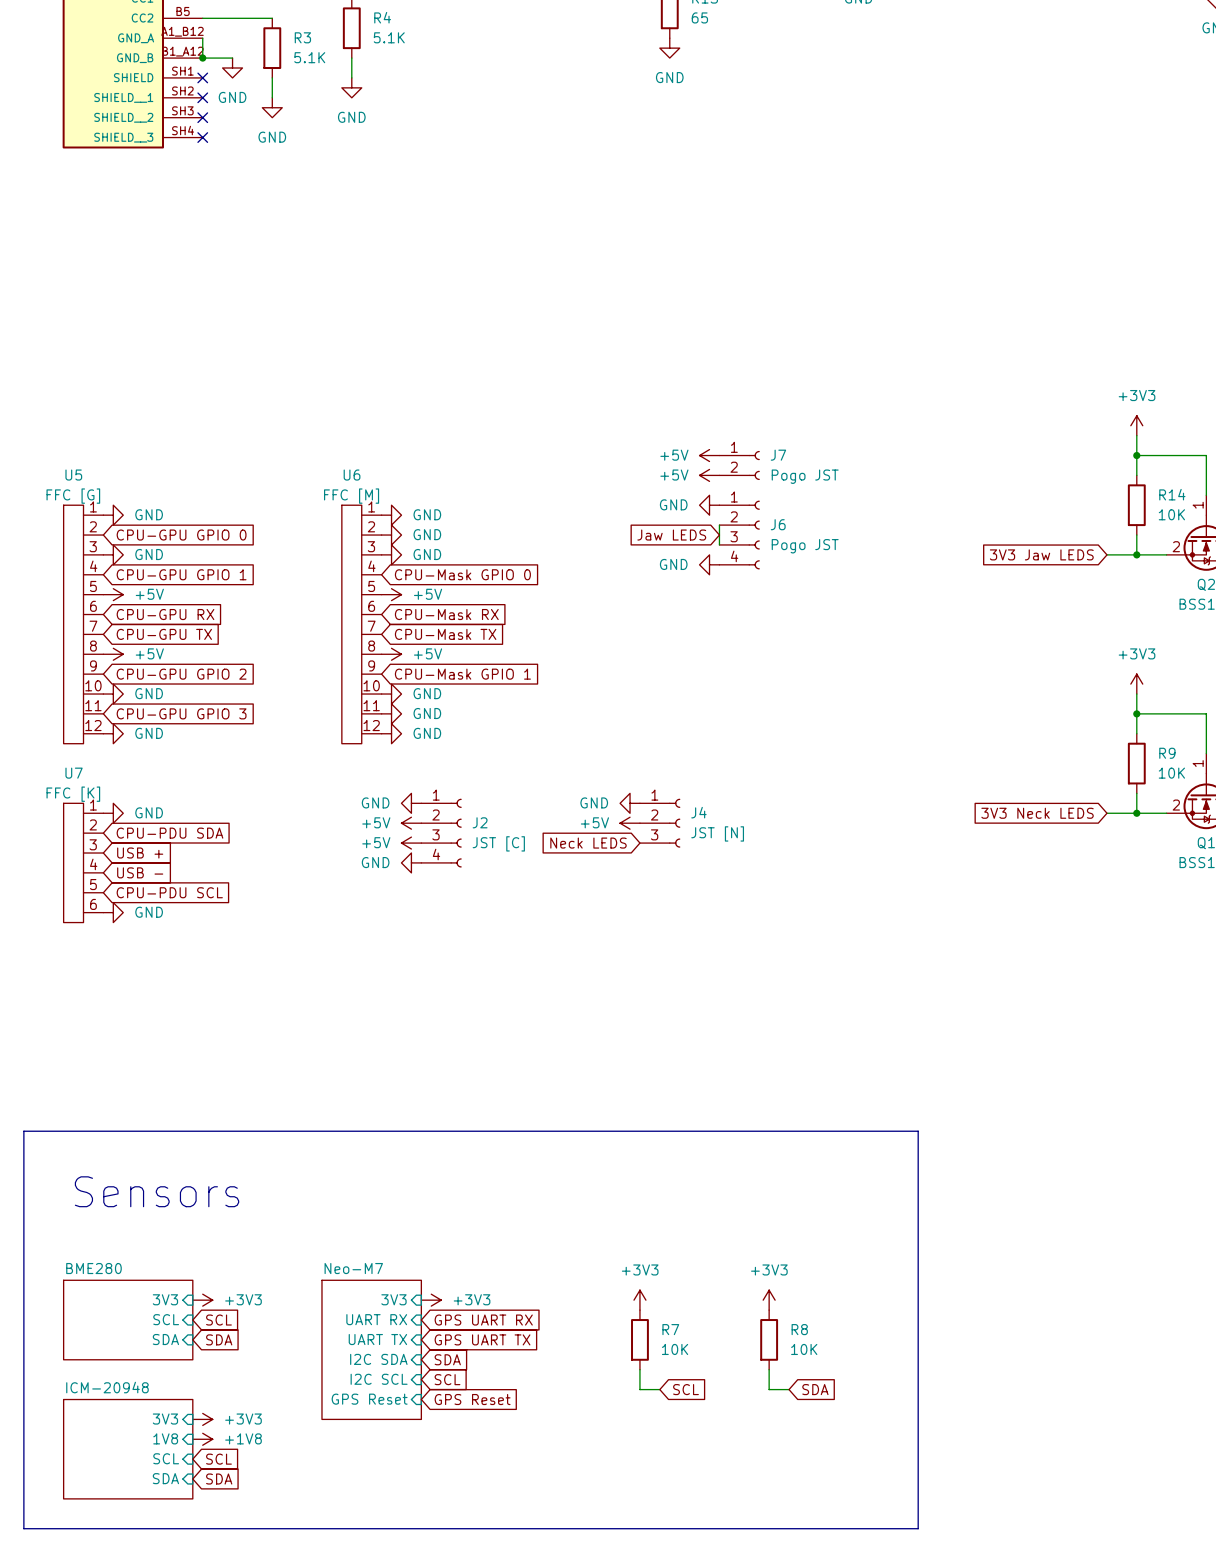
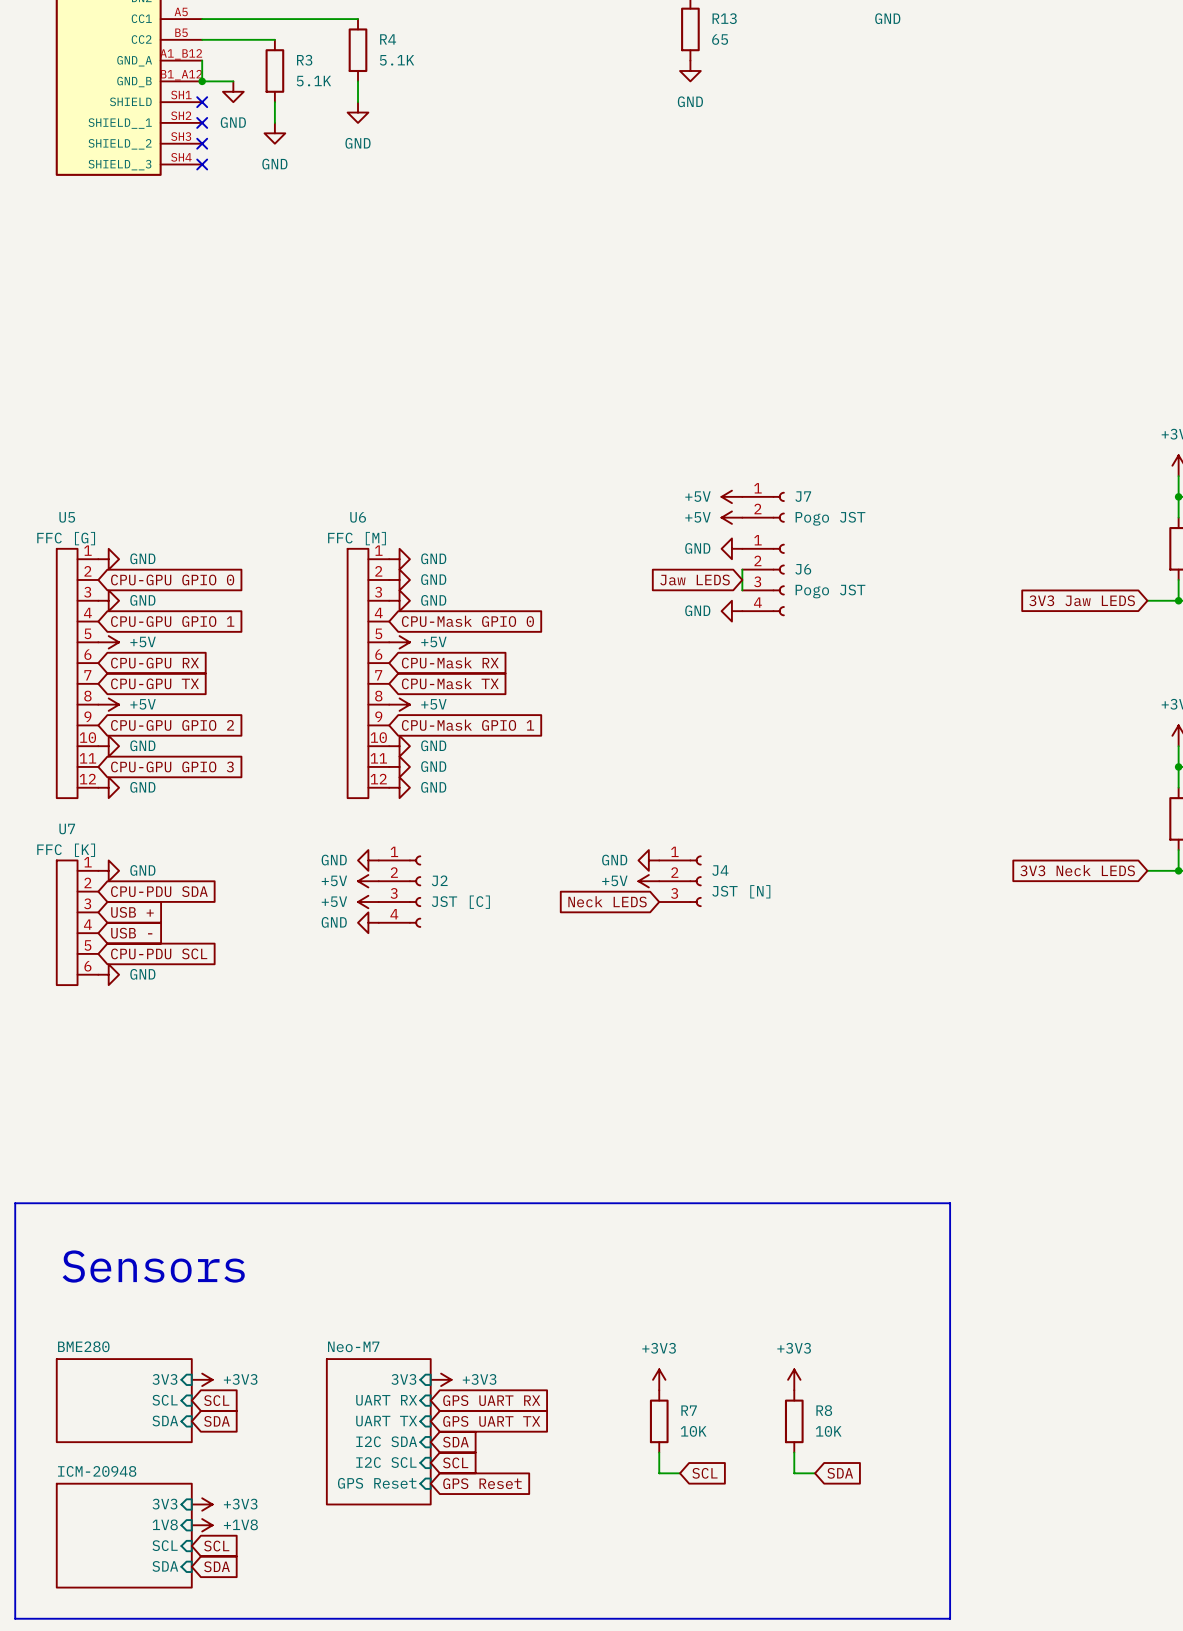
power symbol: none -> GND (368, 860)
power symbol: GND (411, 803) -> none
power symbol: none -> +5V (368, 881)
power symbol: +5V (411, 823) -> none
J2 position: (441, 833) -> (399, 891)
power symbol: none -> +5V (368, 902)
power symbol: +5V (411, 843) -> none
power symbol: none -> GND (368, 922)
power symbol: GND (411, 862) -> none

